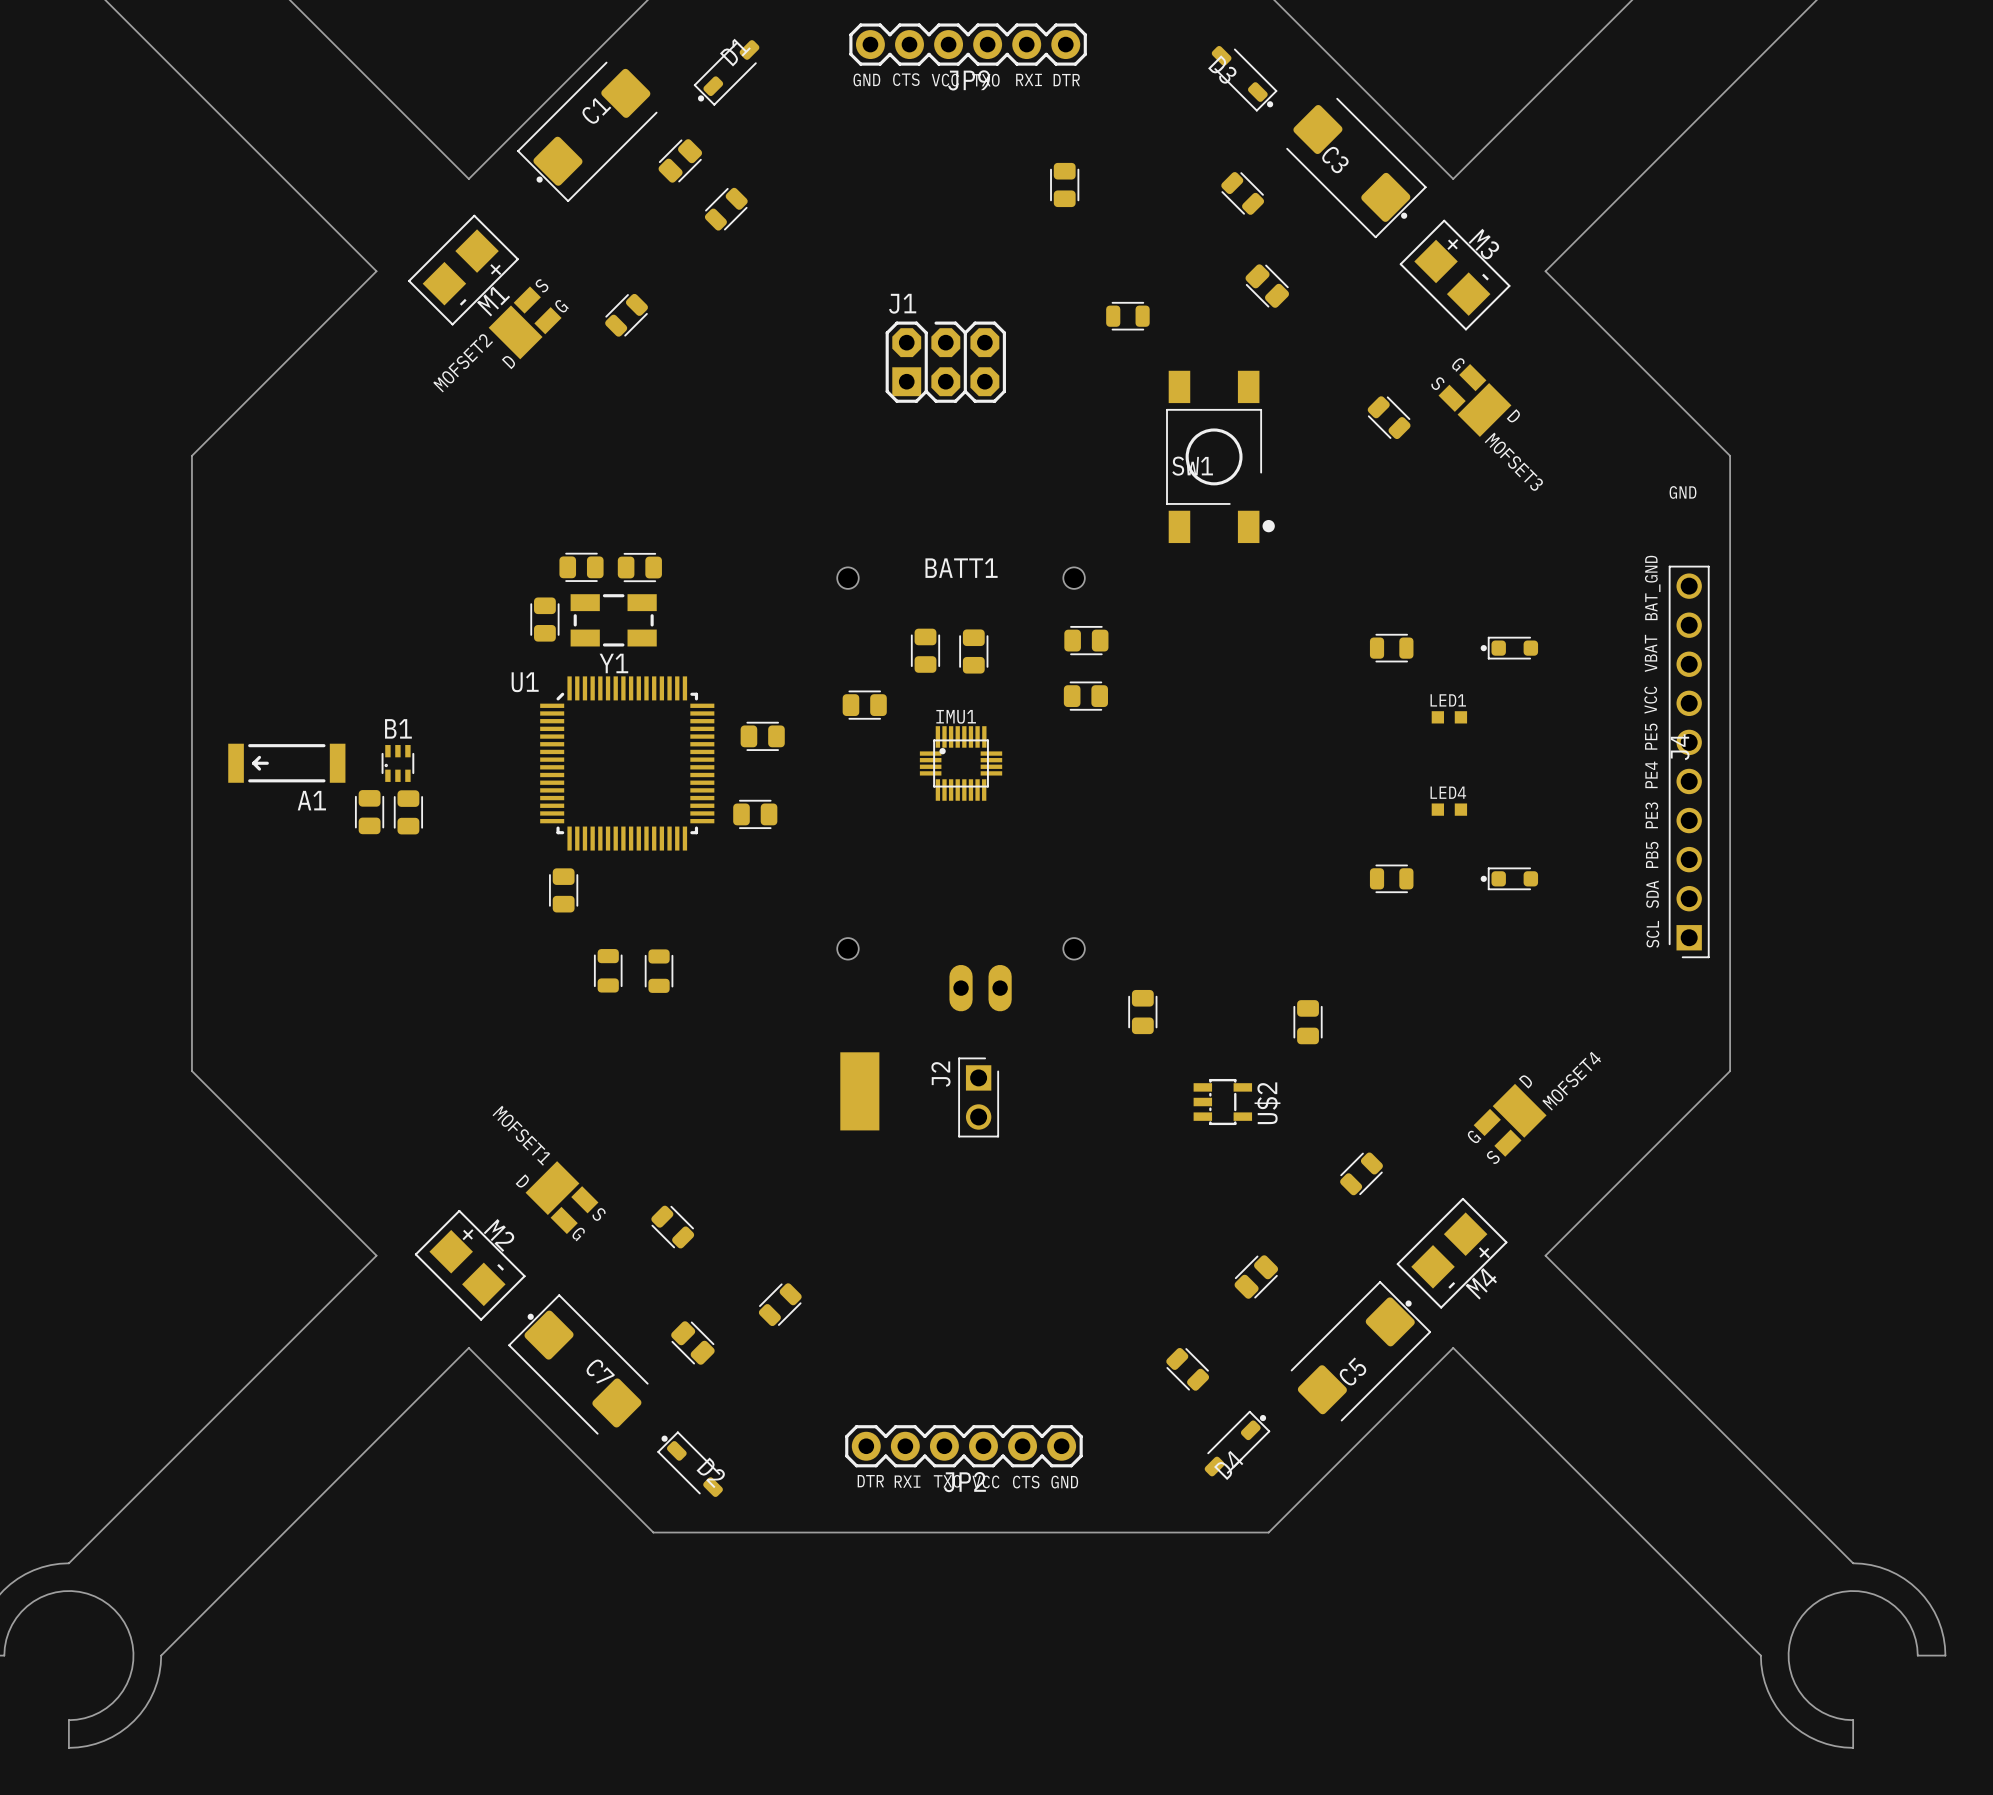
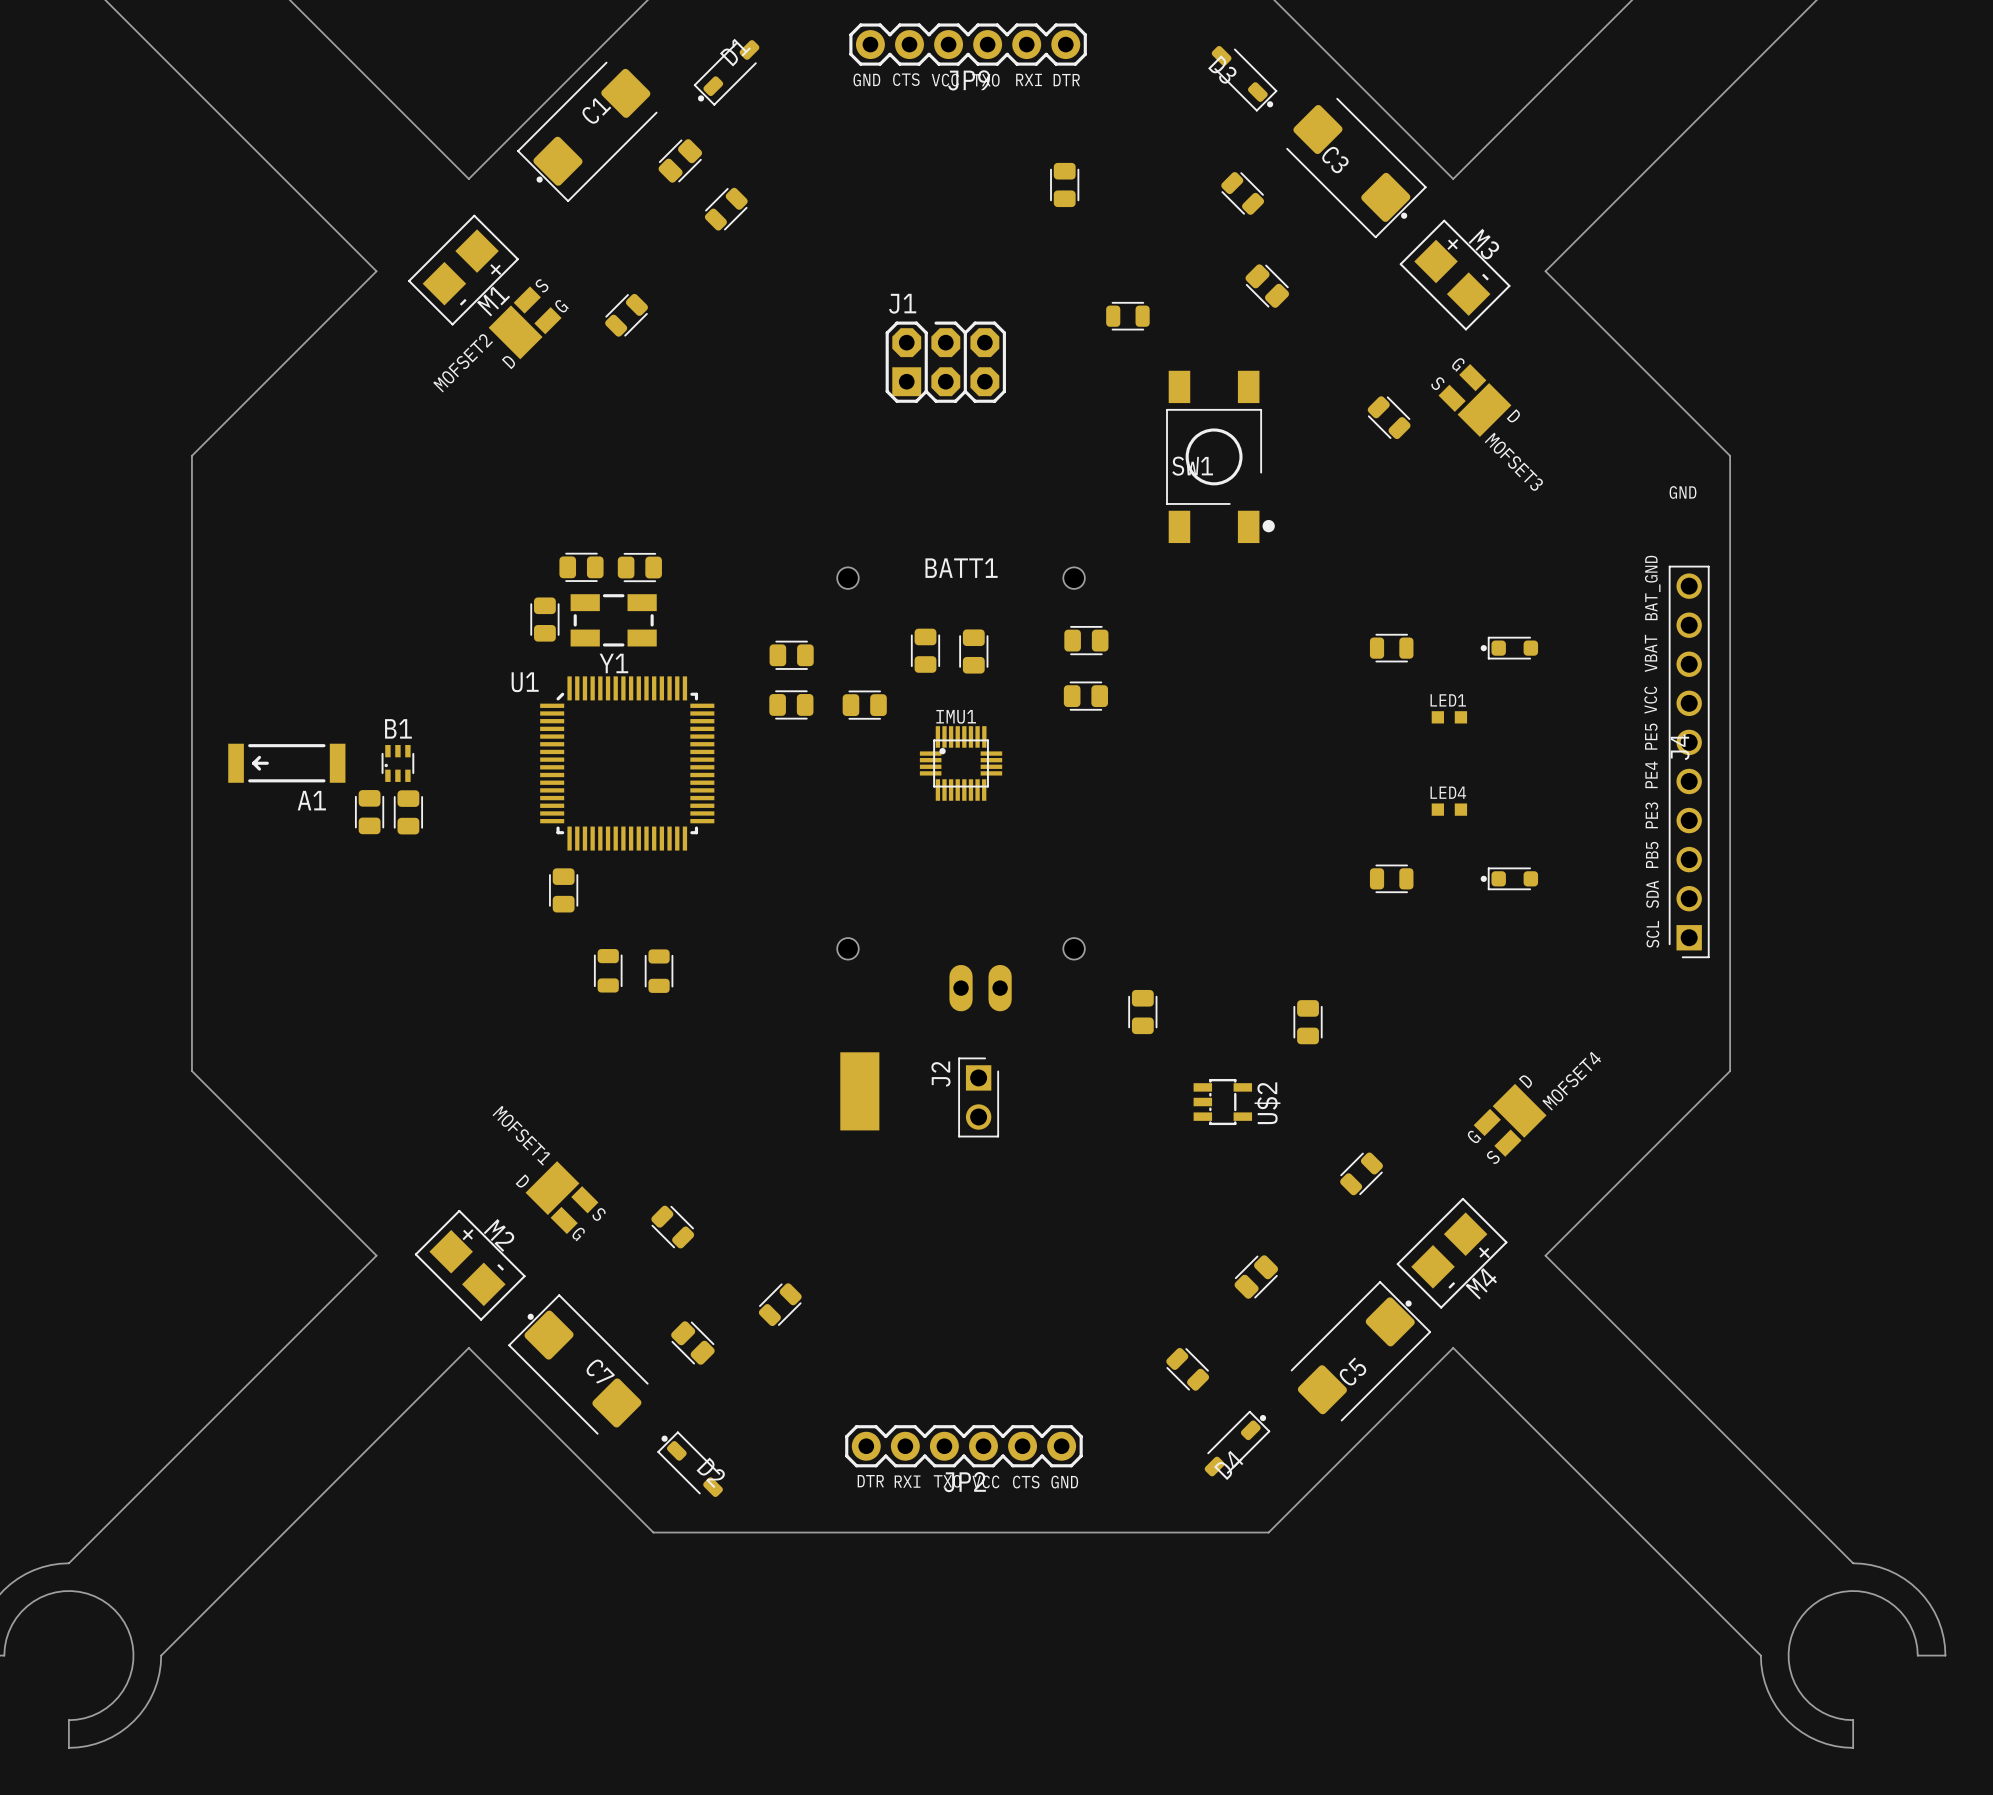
part: none -> (791, 655)
part position: (762, 736) -> (791, 704)
part: (755, 814) -> none

